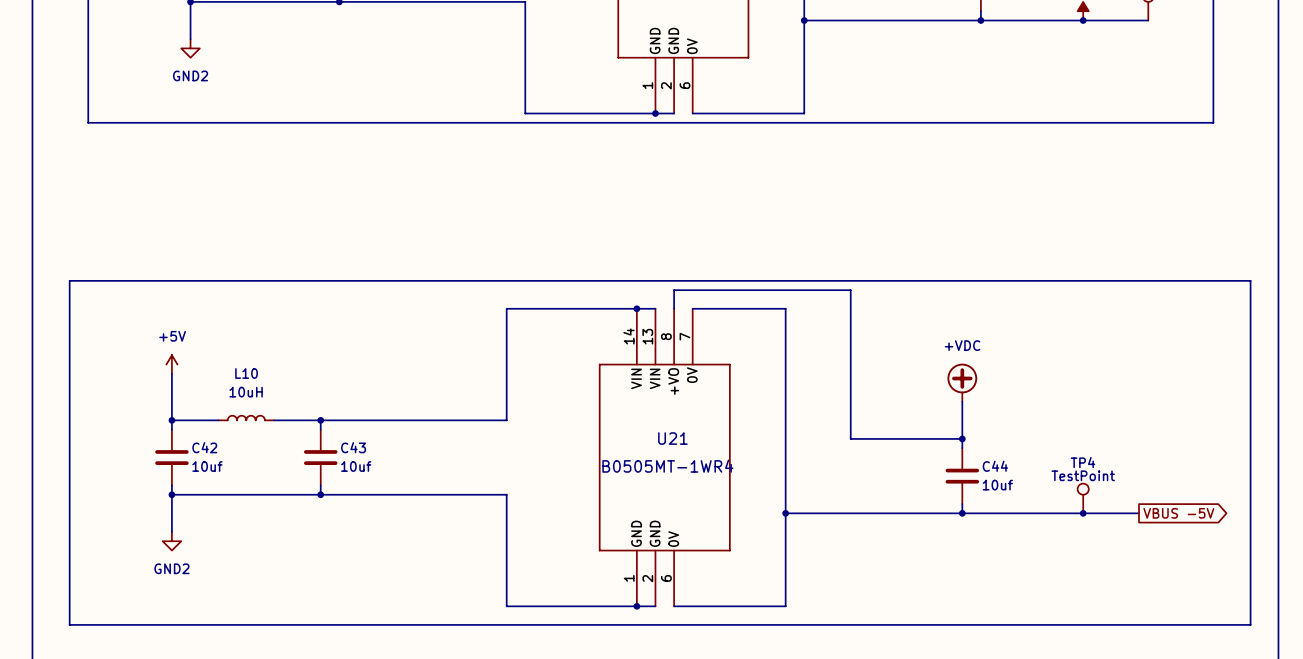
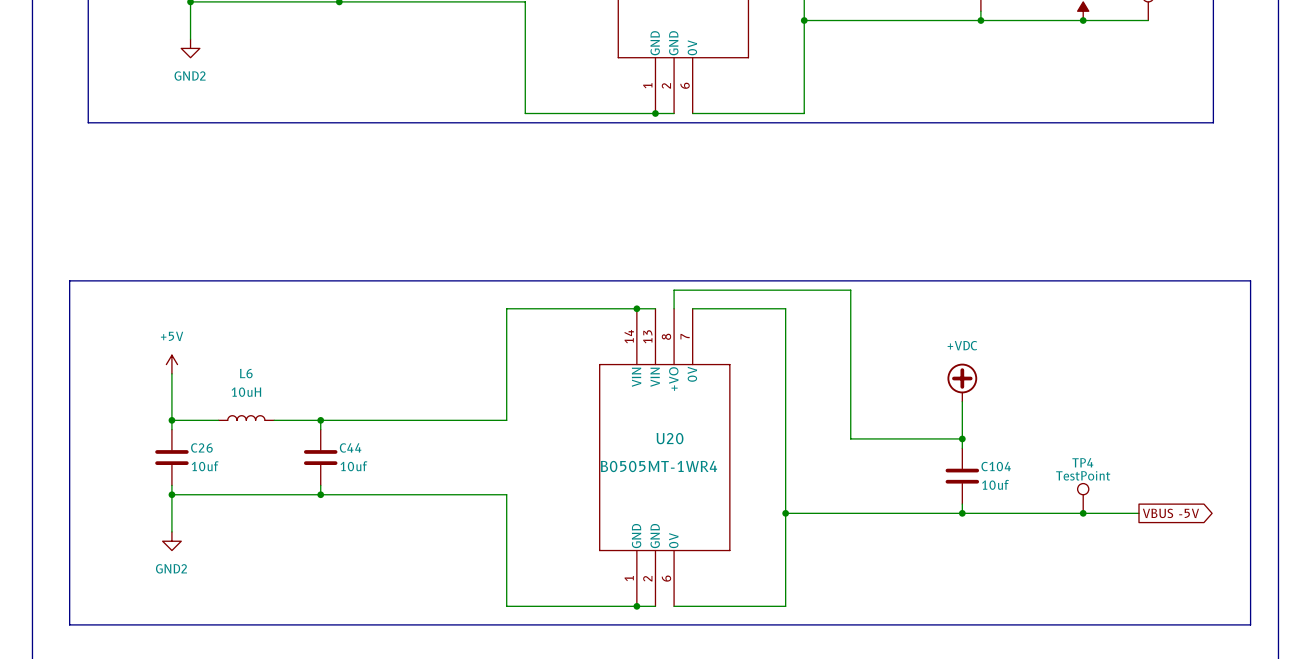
L10 name: L10 (246, 373) -> L6 (246, 373)
U21 name: U21 (672, 438) -> U20 (670, 438)
C42 name: C42 (204, 447) -> C26 (201, 447)
C43 name: C43 (353, 447) -> C44 (350, 447)
C44 name: C44 (995, 466) -> C104 (996, 466)

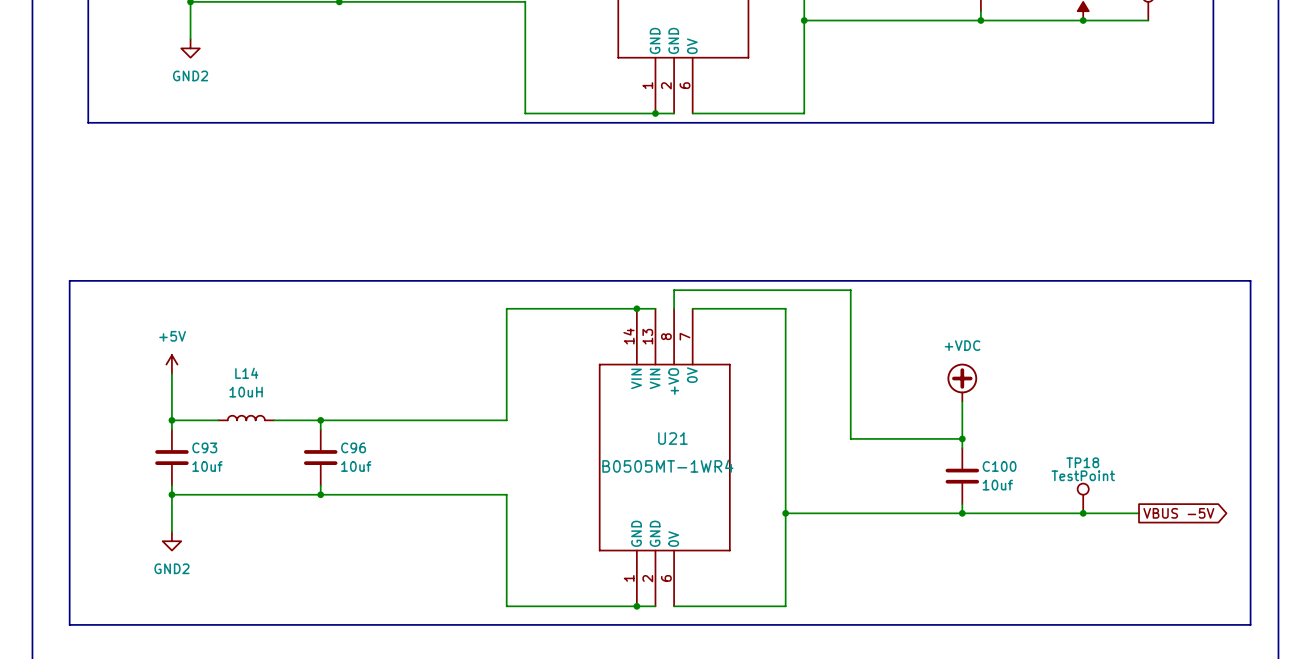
L6 name: L6 (246, 373) -> L14 (246, 373)
U20 name: U20 (670, 438) -> U21 (672, 438)
C26 name: C26 (201, 447) -> C93 (204, 447)
C44 name: C44 (350, 447) -> C96 (353, 447)
TP4 name: TP4 (1082, 462) -> TP18 (1082, 462)
C104 name: C104 (996, 466) -> C100 (999, 466)

